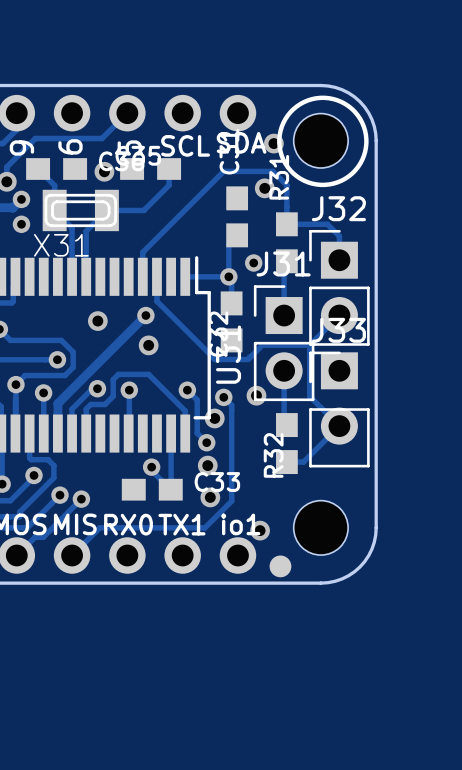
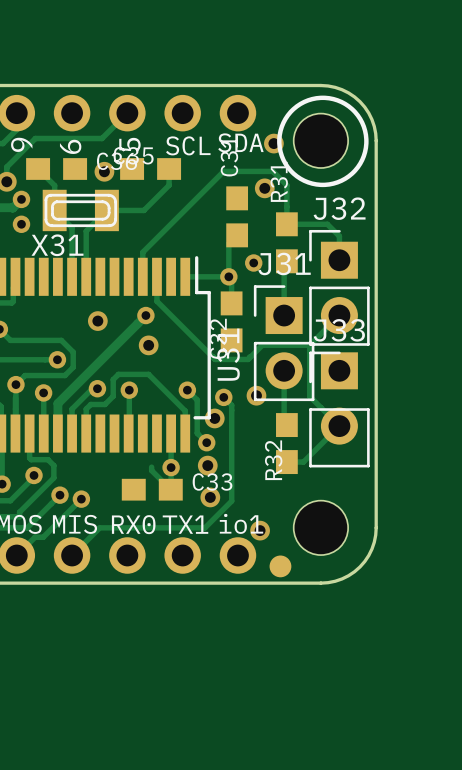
via position: (151, 467) -> (171, 467)

